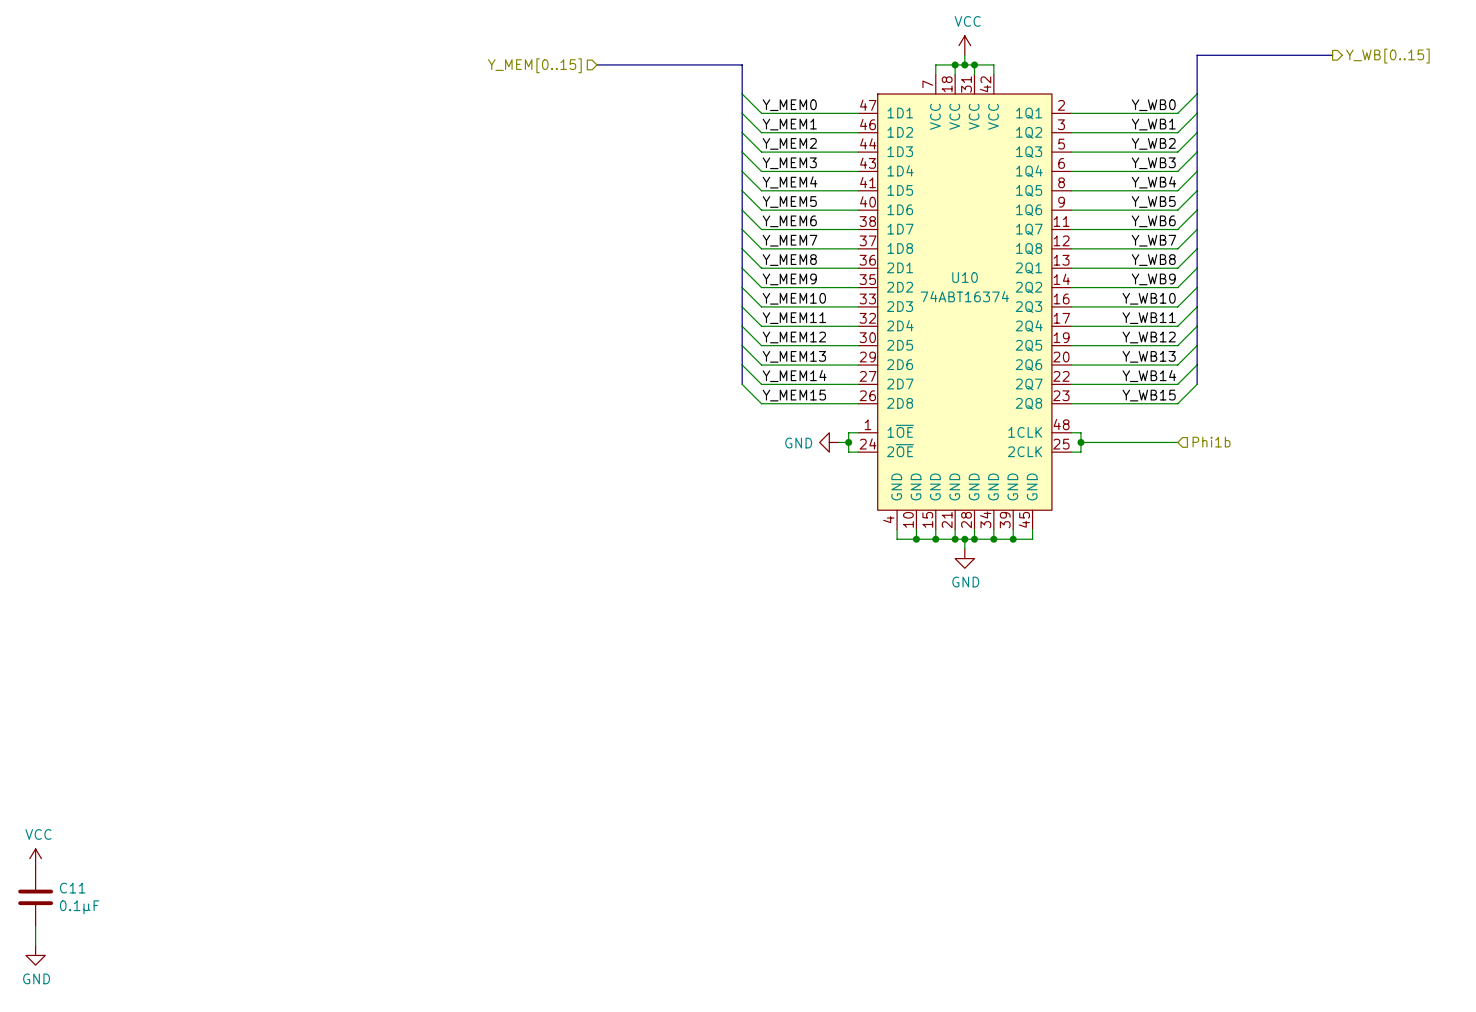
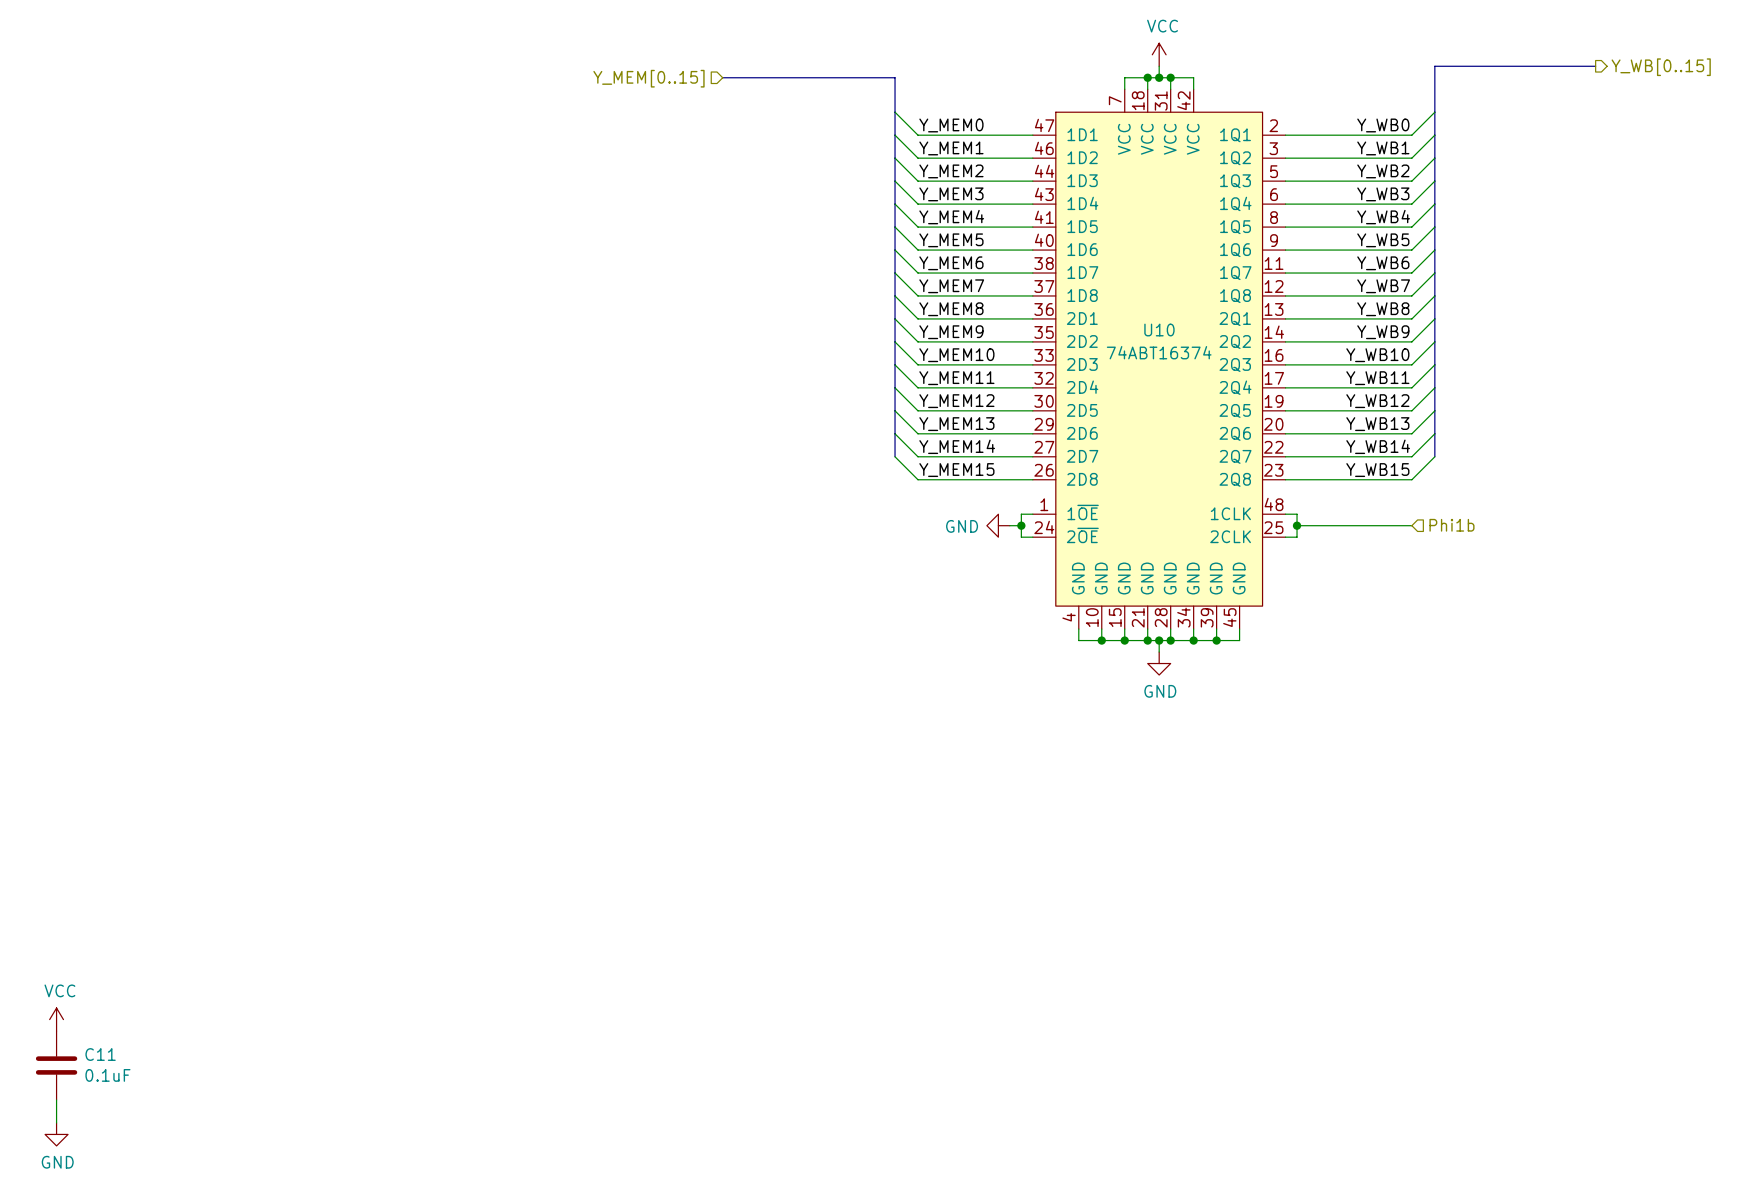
C11 value: 0.1μF (79, 907) -> 0.1uF (107, 1075)

